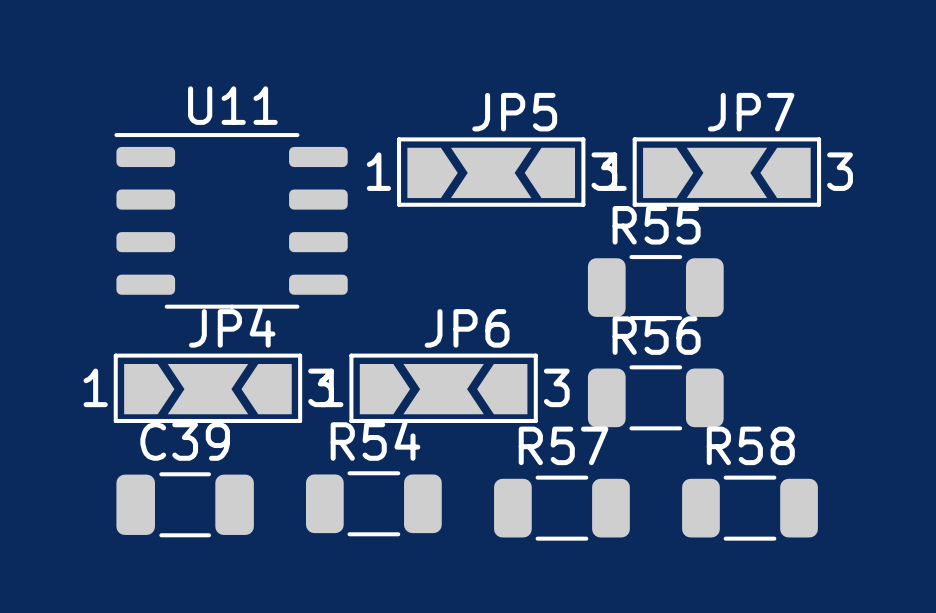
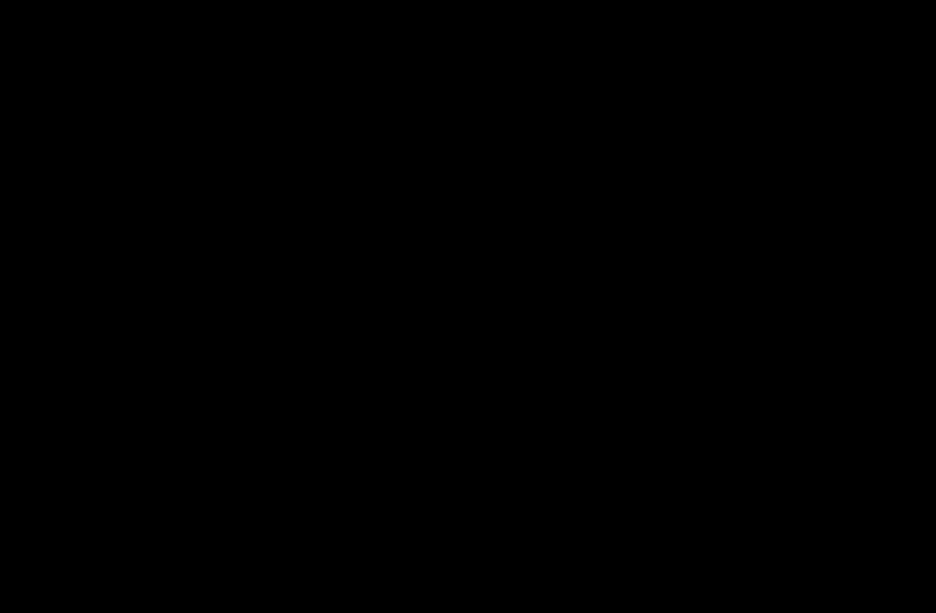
JP5: (491, 172) -> none
JP7: (726, 172) -> none
U11: (231, 220) -> none
R55: (655, 287) -> none
JP4: (207, 388) -> none
JP6: (443, 388) -> none
R56: (655, 397) -> none
R54: (373, 503) -> none
C39: (185, 504) -> none
R57: (561, 508) -> none
R58: (750, 508) -> none

